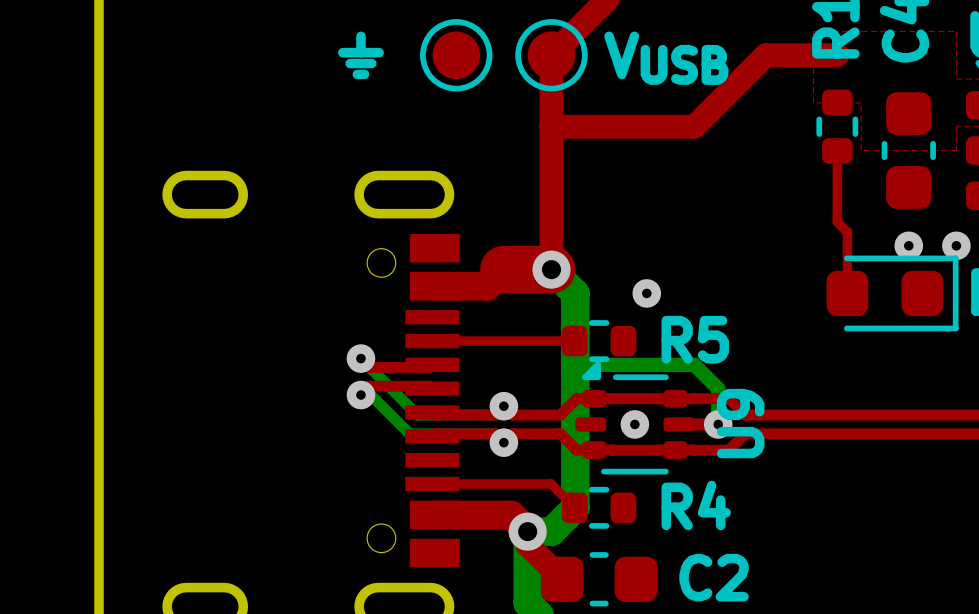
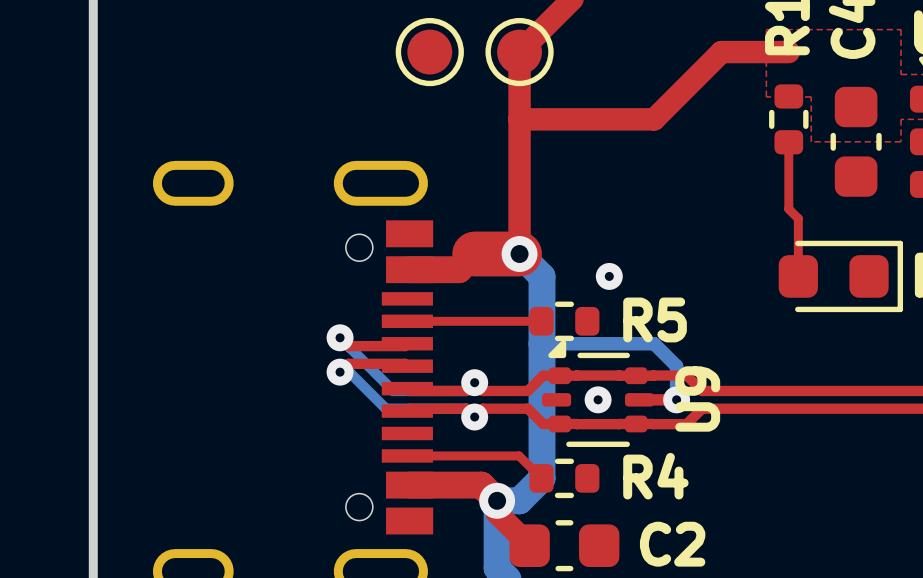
text: ⏚ (360, 55) -> none
text: VUSB (666, 58) -> none
via: (908, 245) -> none
via: (956, 245) -> none

